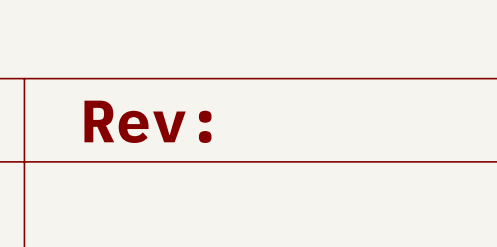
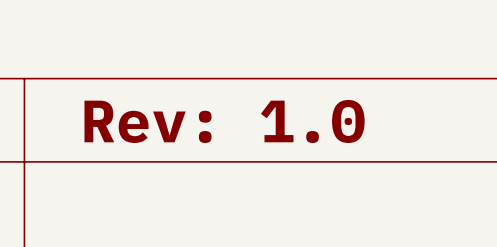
title block: Rev: (147, 121) -> Rev: 1.0 (224, 121)

